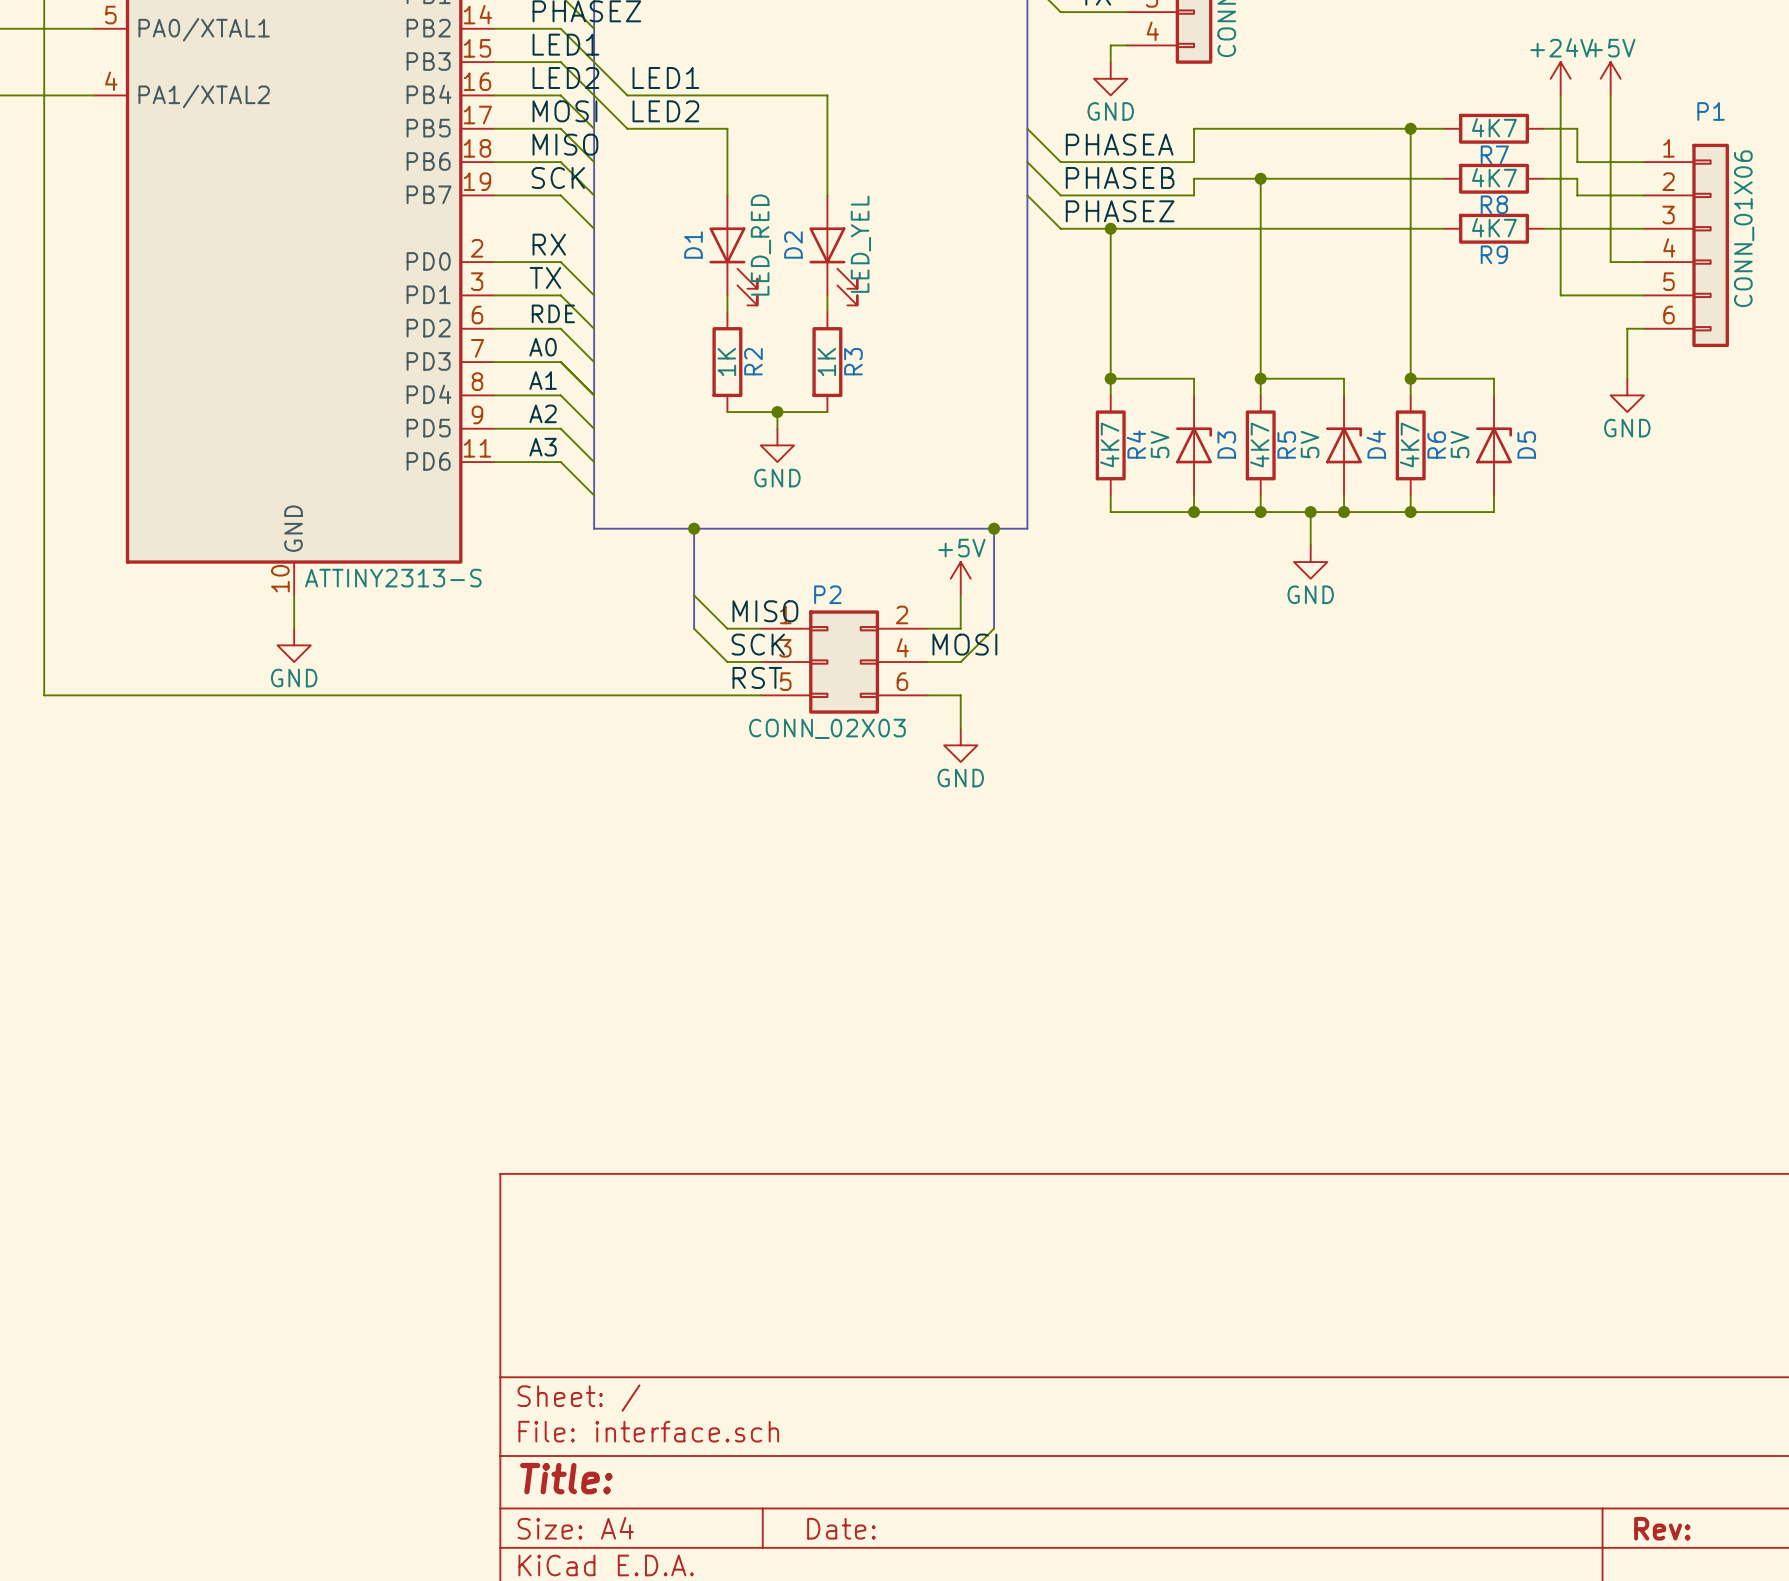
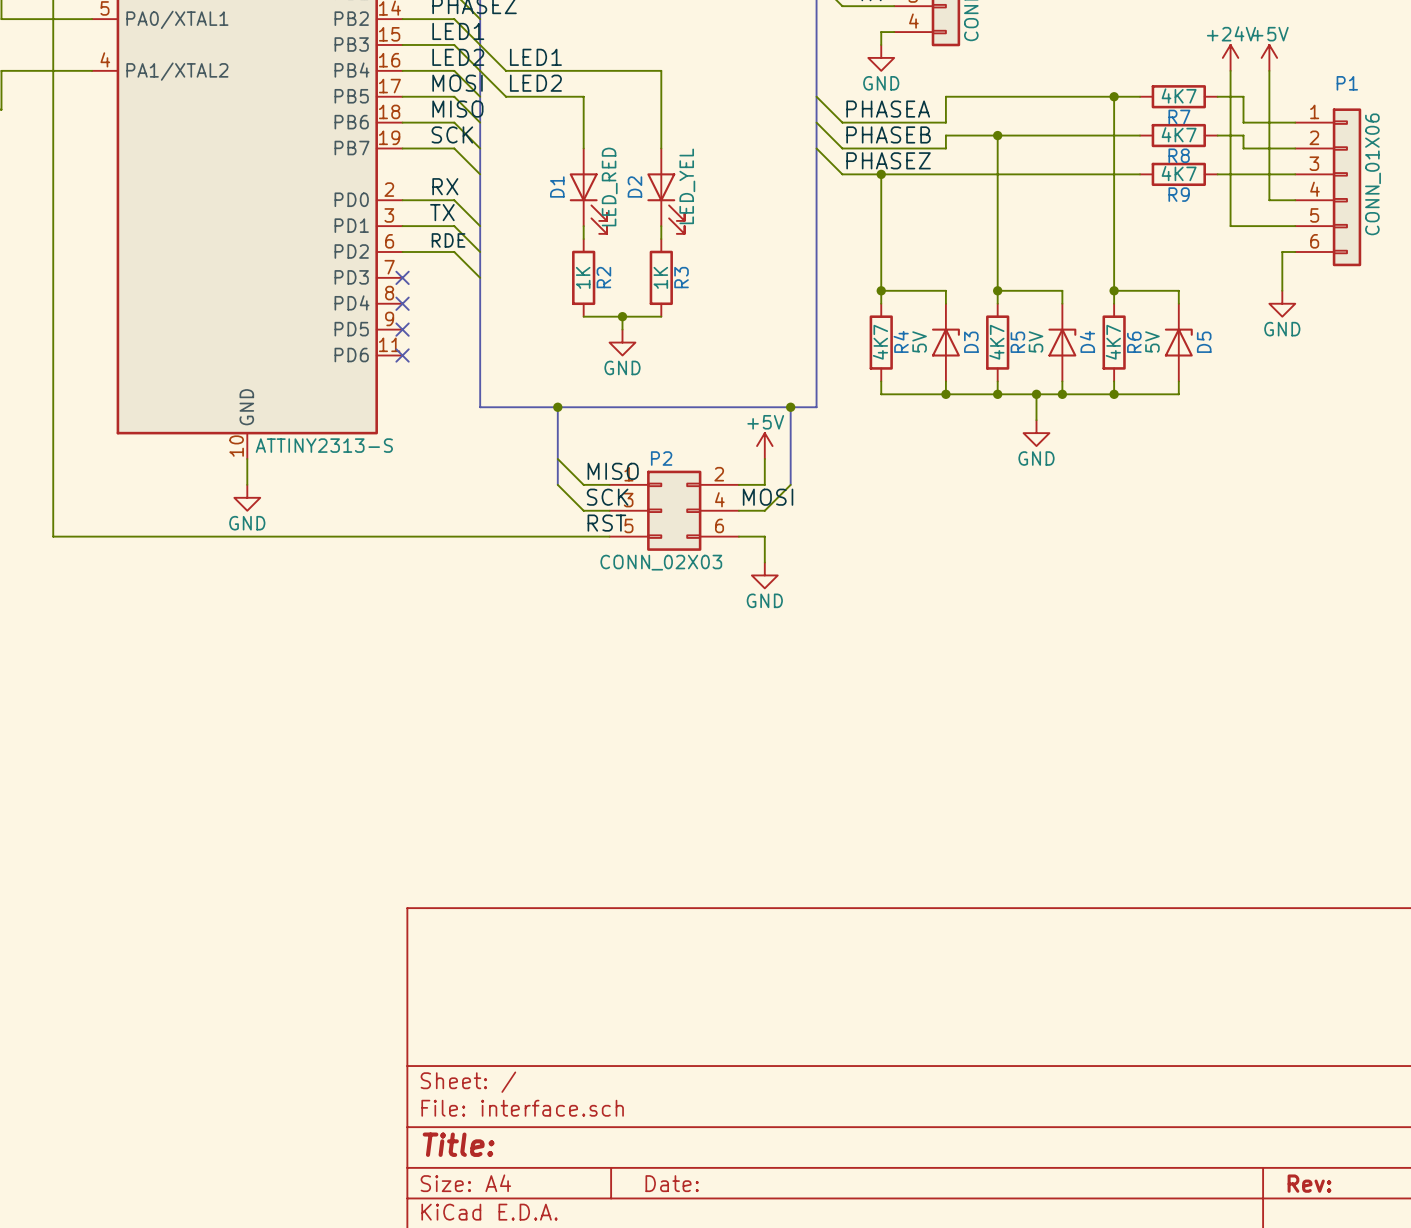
label: A0 (543, 347) -> none
wire: (494, 362) (560, 362) (594, 395) -> none
no-connect mark: none -> (402, 277)
label: A1 (543, 380) -> none
wire: (494, 395) (560, 395) (594, 428) -> none
no-connect mark: none -> (402, 303)
label: A2 (543, 413) -> none
wire: (494, 428) (560, 428) (594, 462) -> none
no-connect mark: none -> (402, 329)
label: A3 (543, 447) -> none
wire: (494, 462) (560, 462) (594, 495) -> none
no-connect mark: none -> (402, 355)

